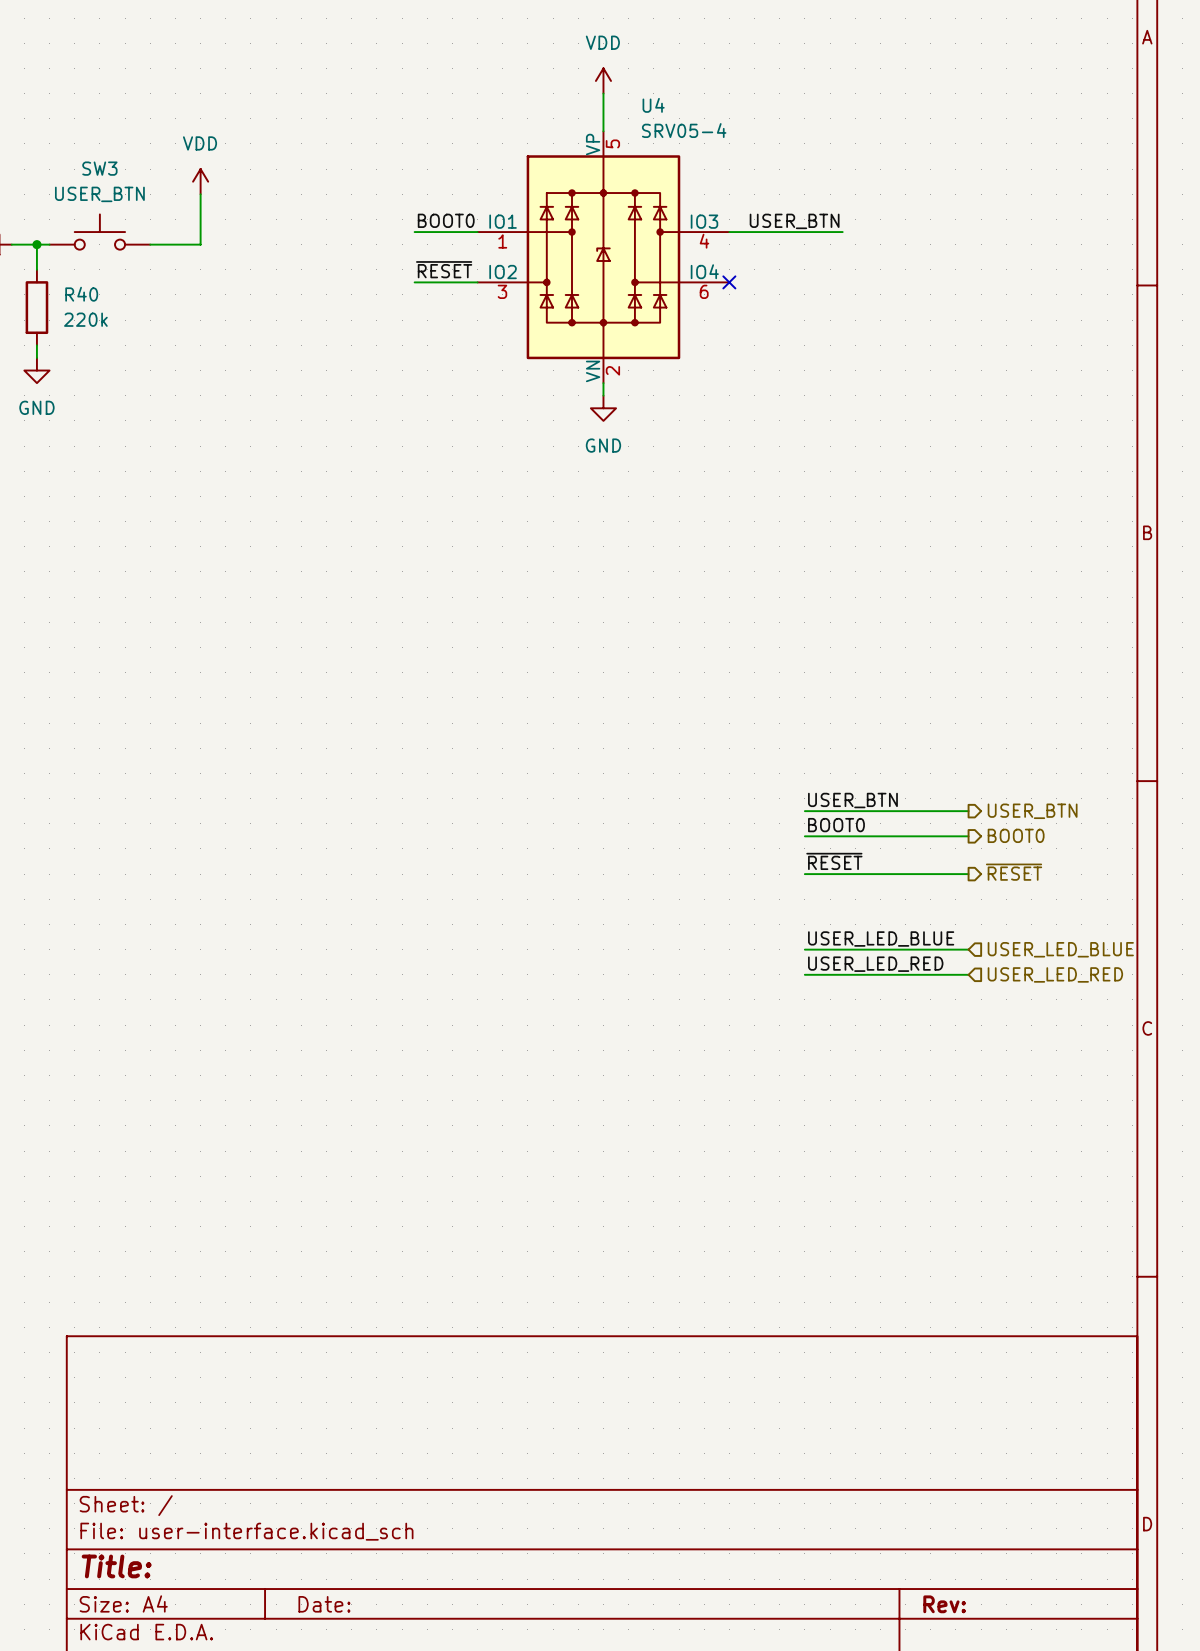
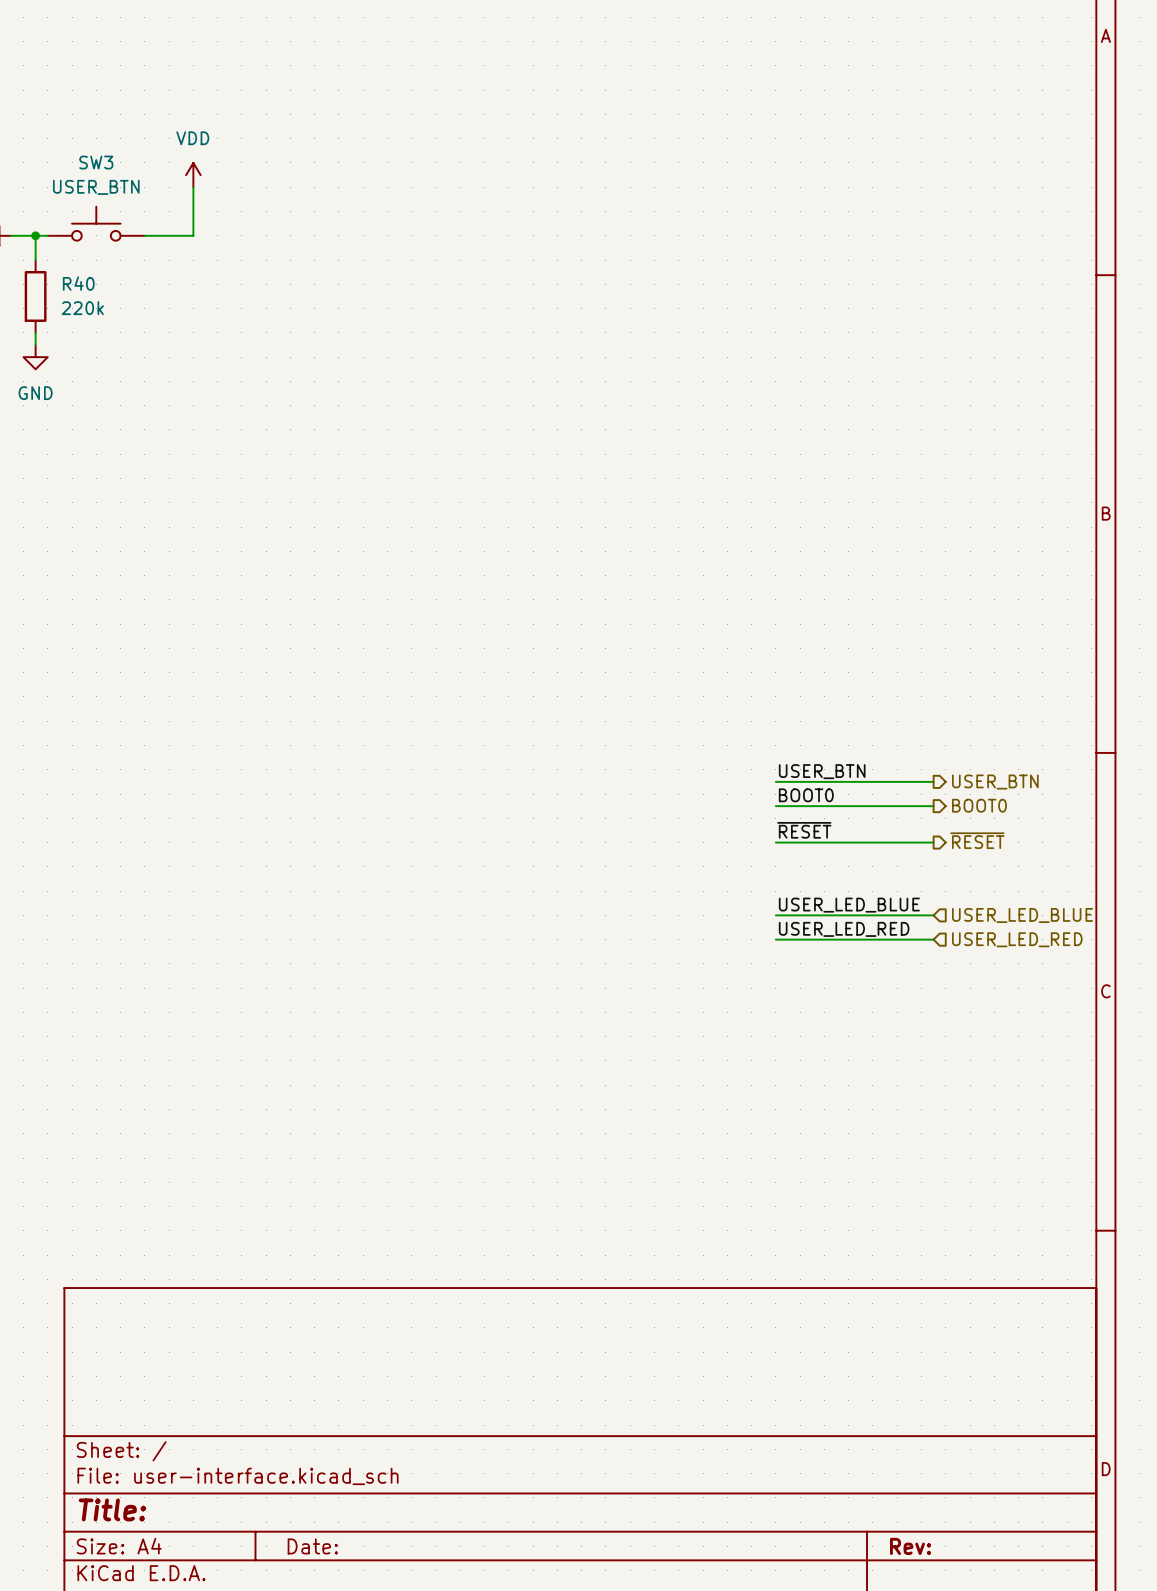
power symbol: VDD (603, 80) -> none
wire: (603, 93) (603, 131) -> none
label: BOOT0 (446, 220) -> none
label: USER_BTN (794, 221) -> none
wire: (414, 232) (477, 232) -> none
wire: (729, 232) (842, 232) -> none
U4: SRV05-4 (603, 257) -> none
label: ~{RESET} (444, 269) -> none
wire: (414, 282) (477, 282) -> none
no-connect mark: (729, 282) -> none
wire: (603, 383) (603, 395) -> none
power symbol: GND (603, 408) -> none

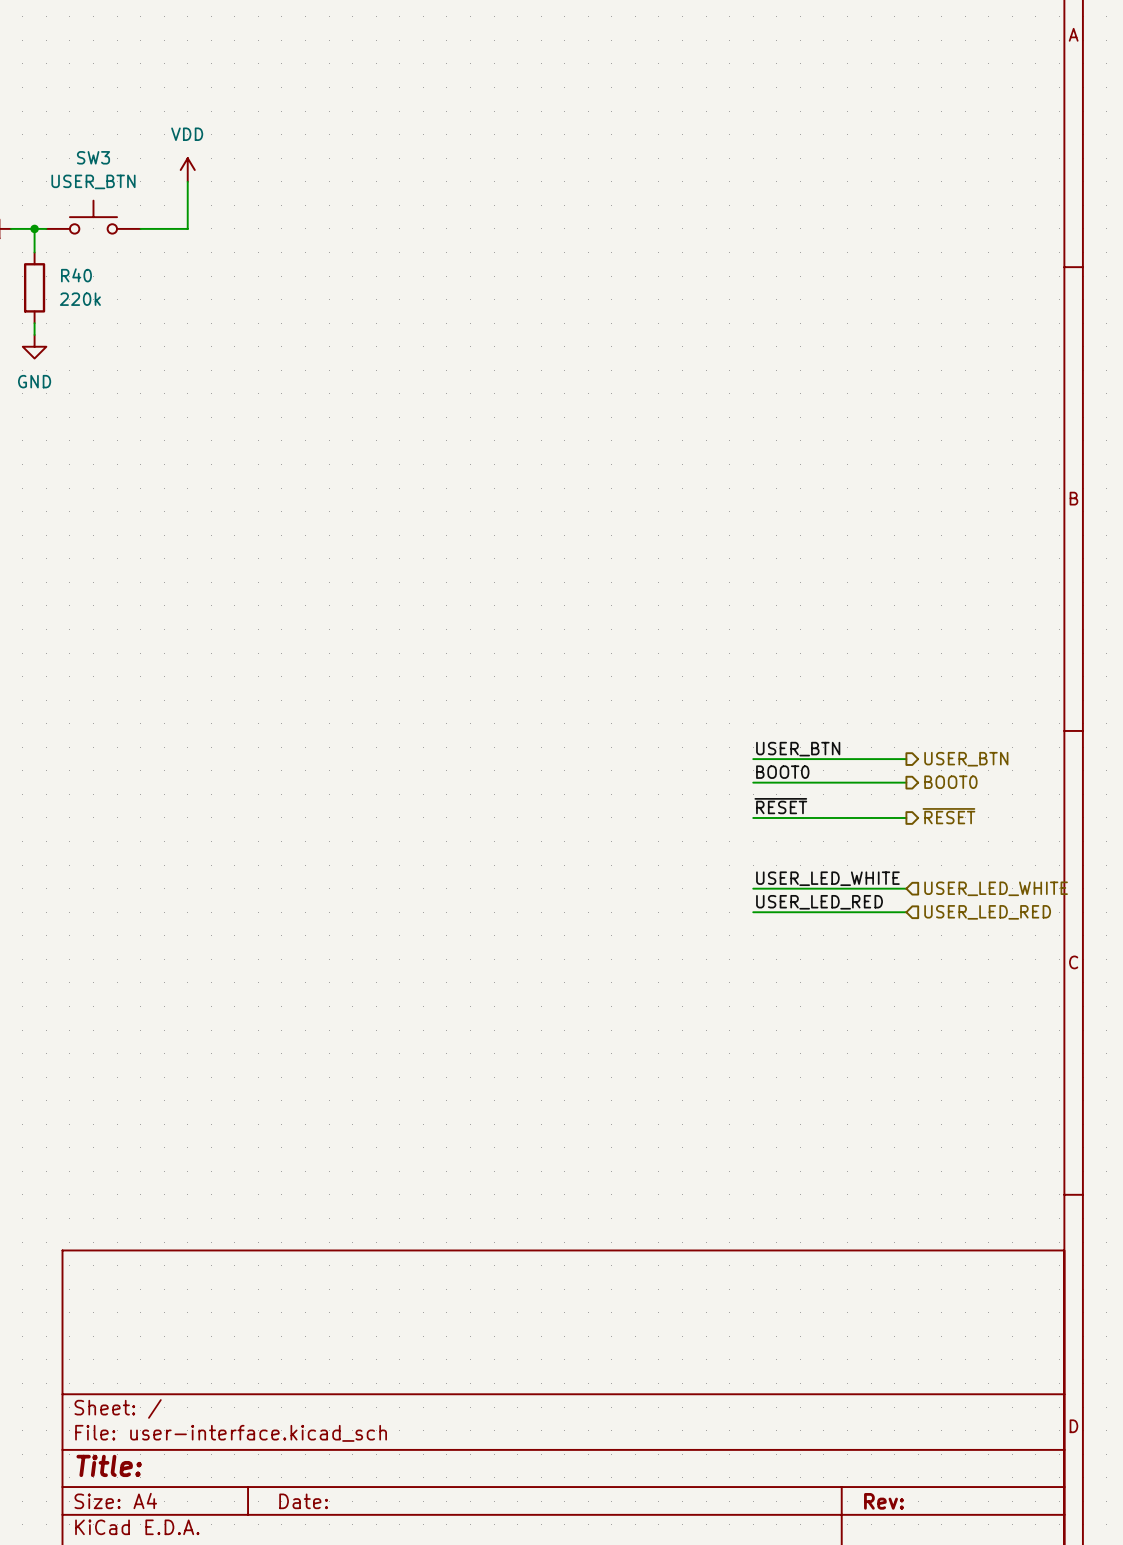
label: USER_LED_BLUE (849, 905) -> USER_LED_WHITE (827, 878)
hierarchical label: USER_LED_BLUE (1022, 915) -> USER_LED_WHITE (996, 888)

